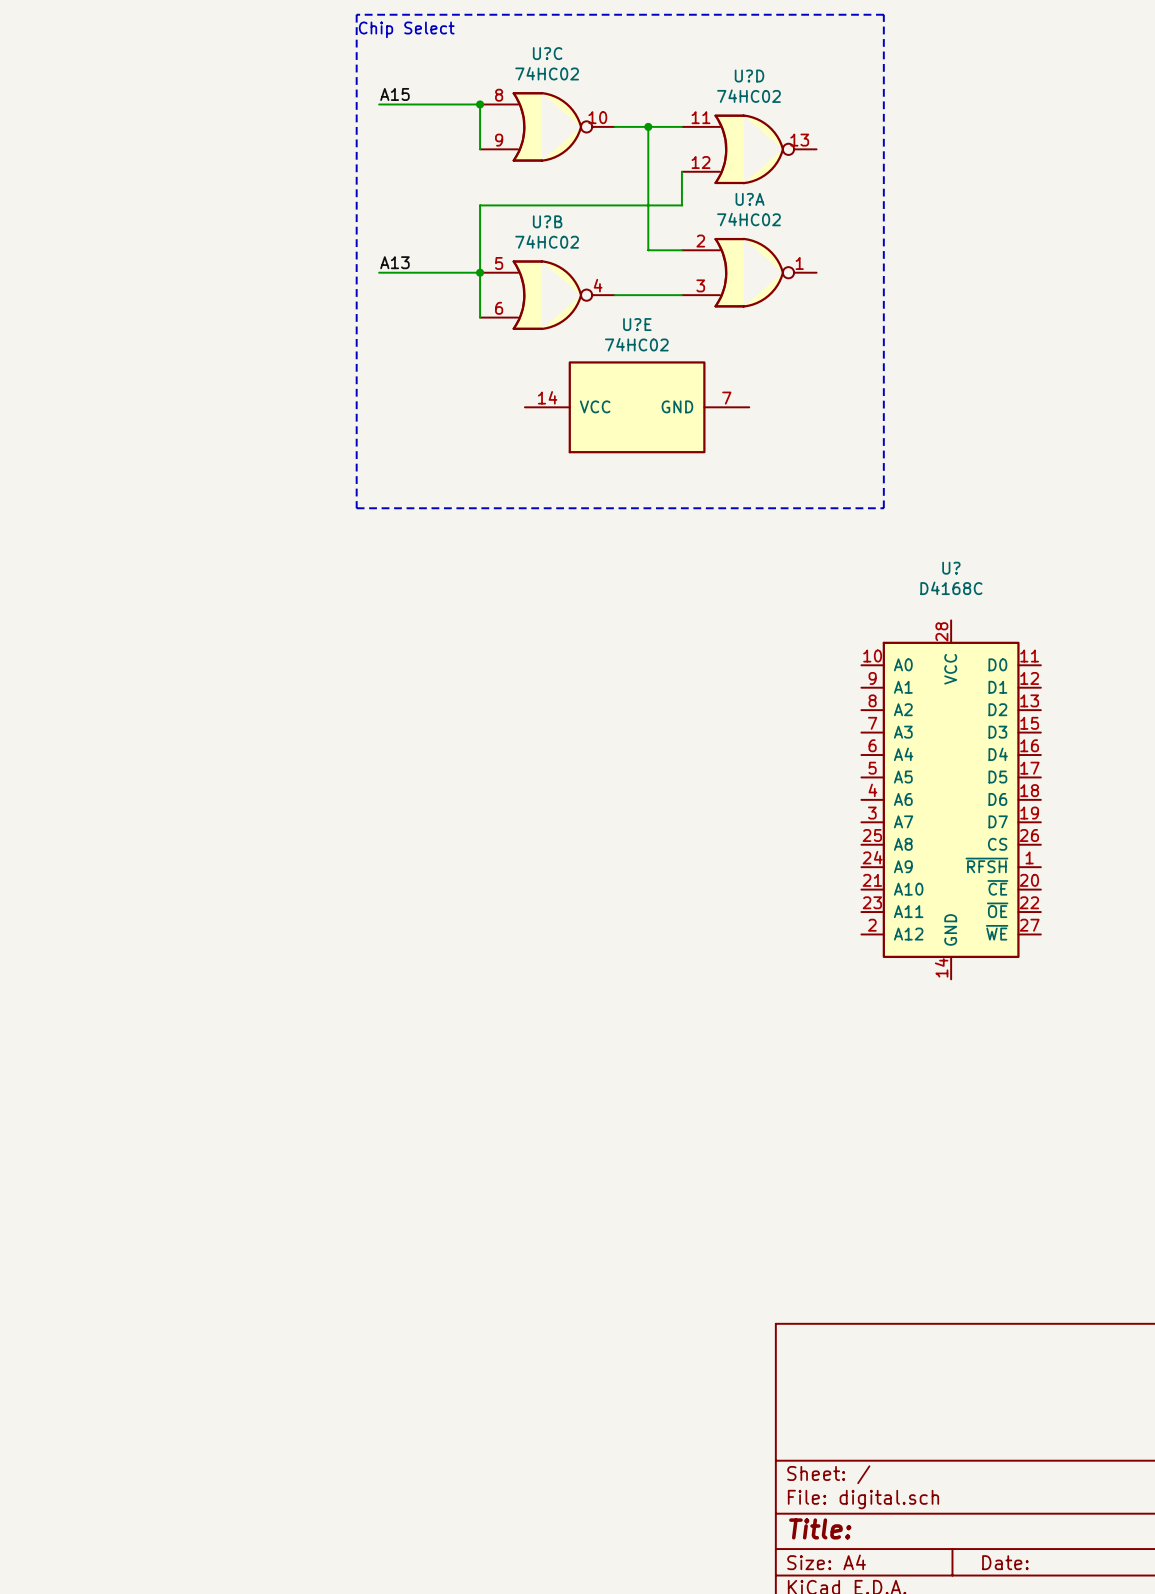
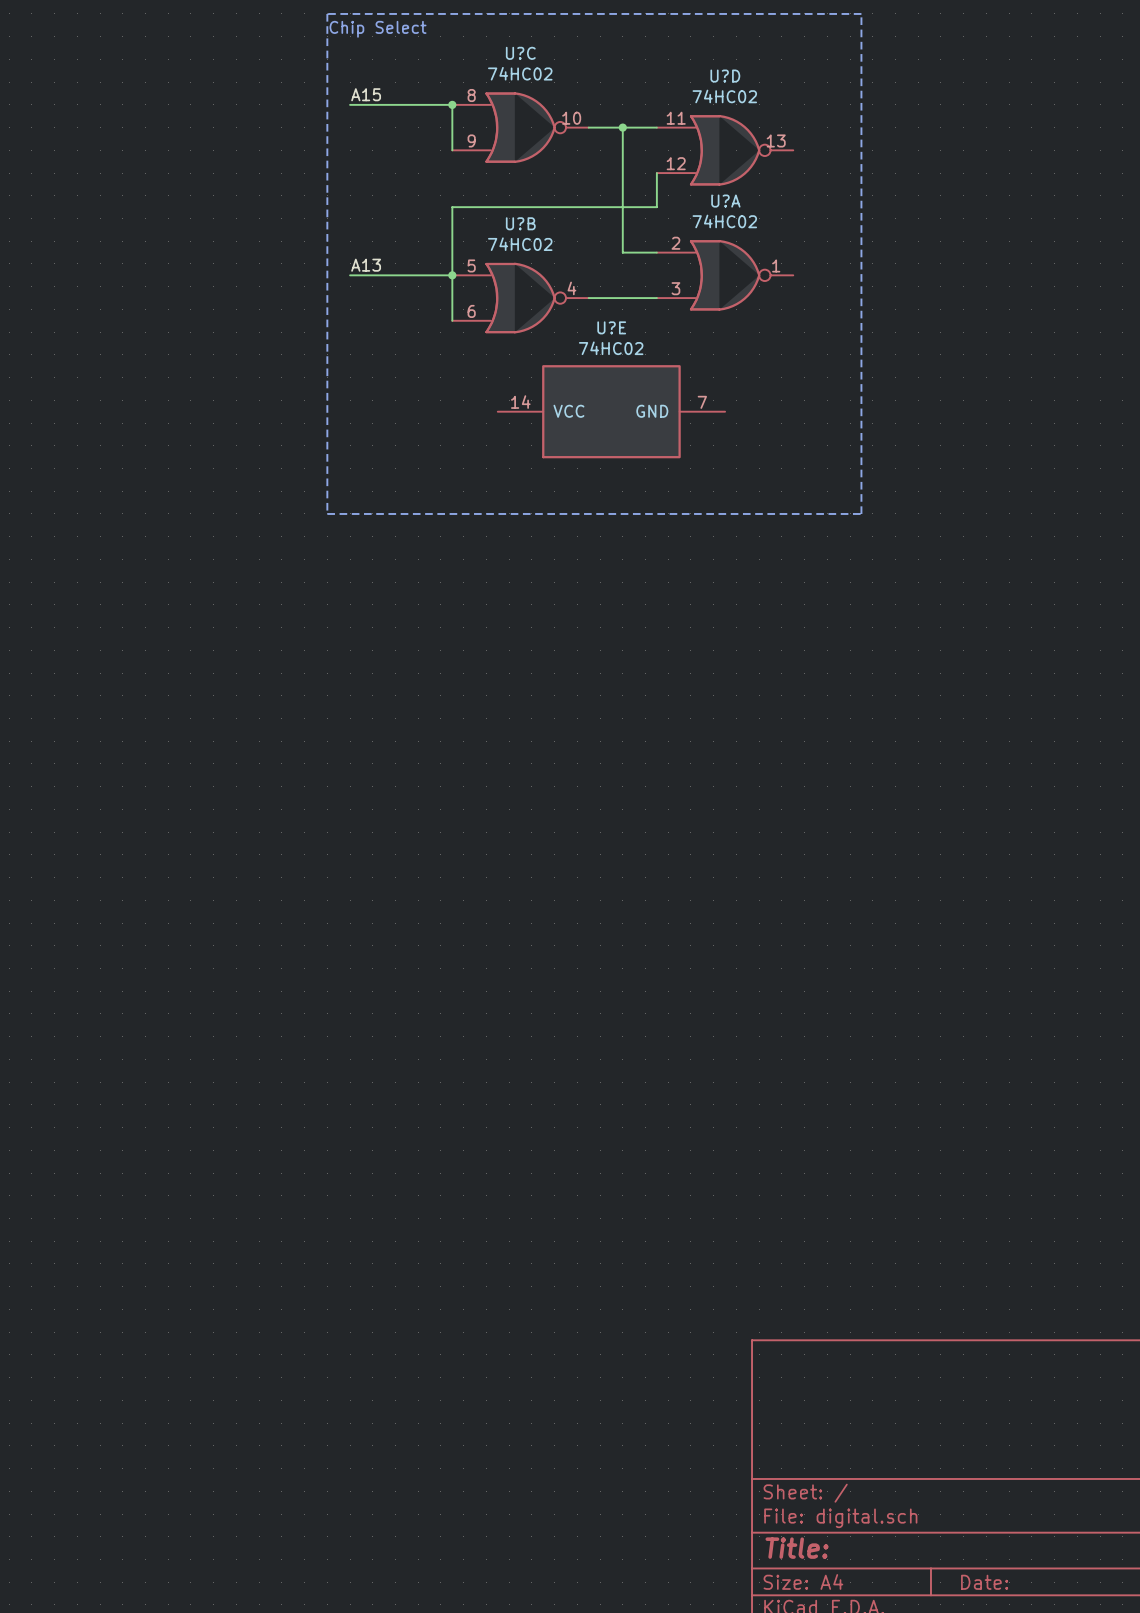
U?: D4168C (951, 799) -> none

